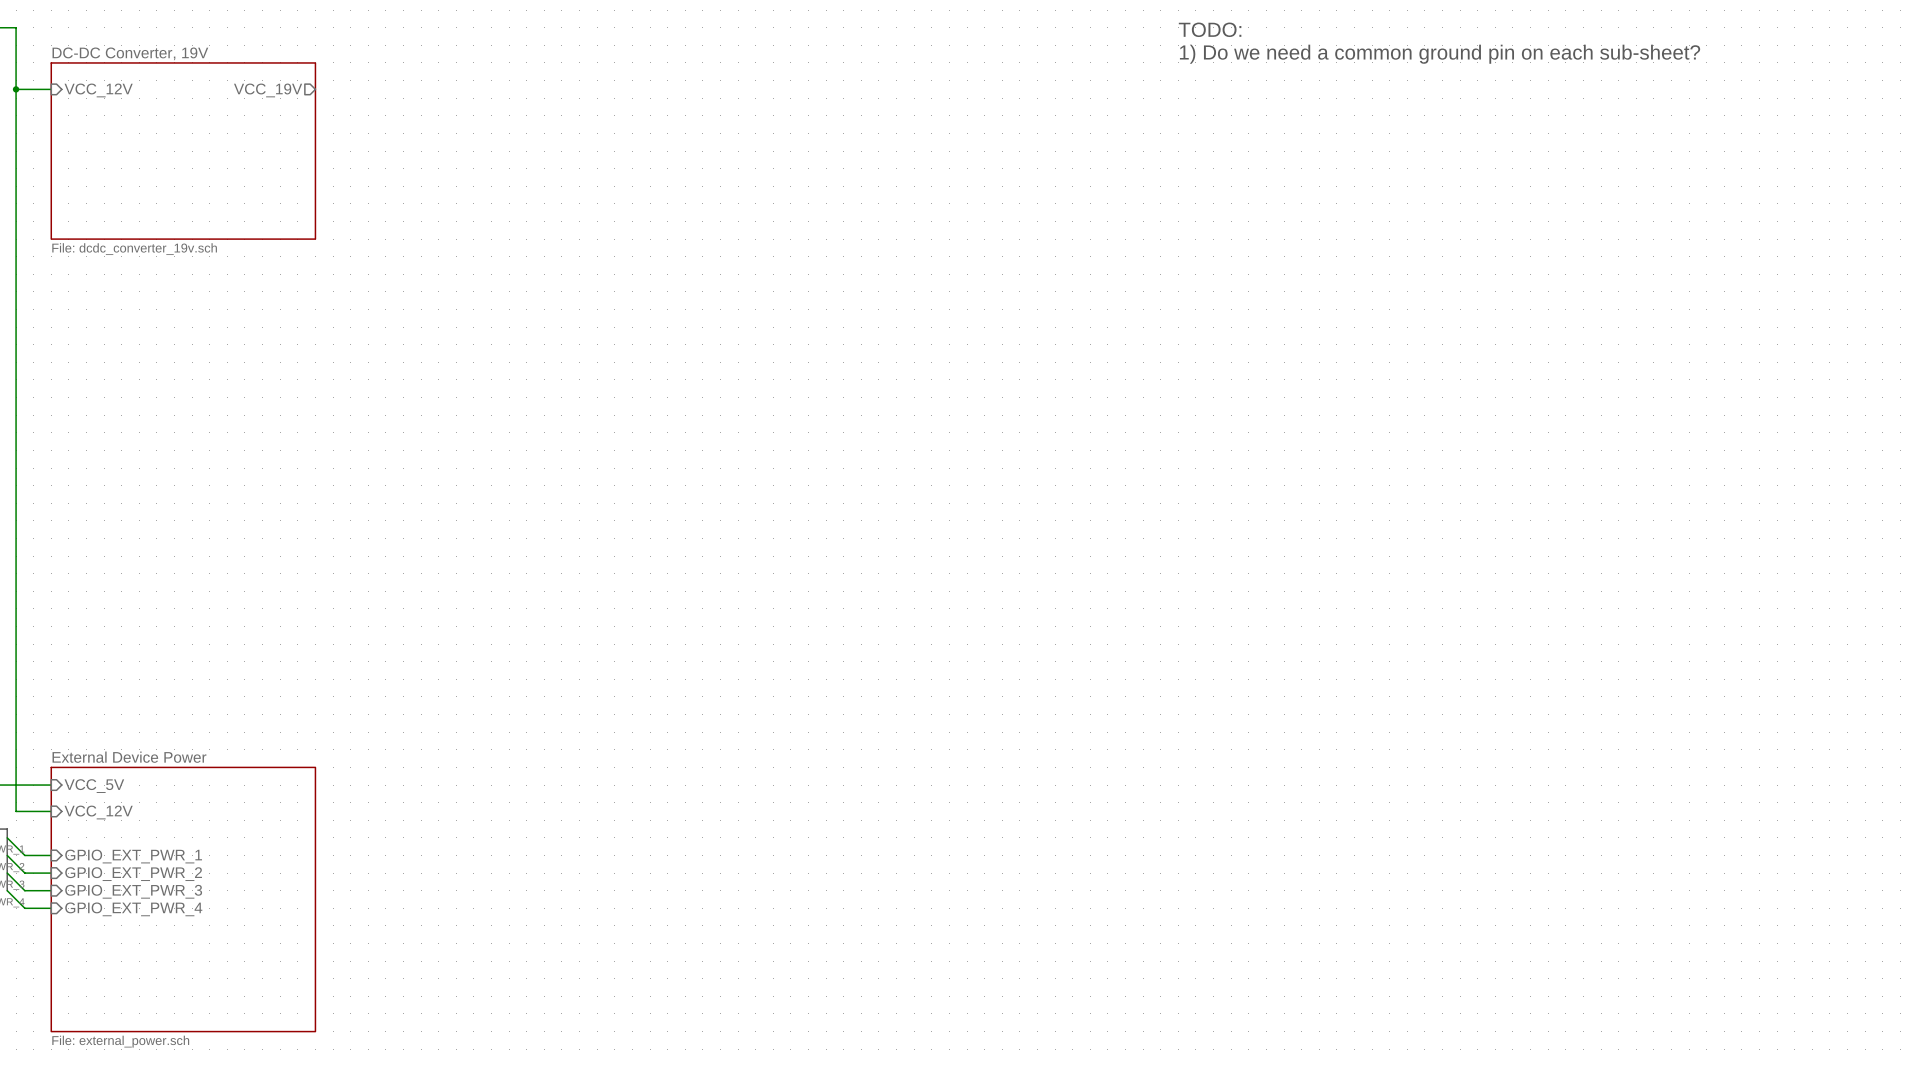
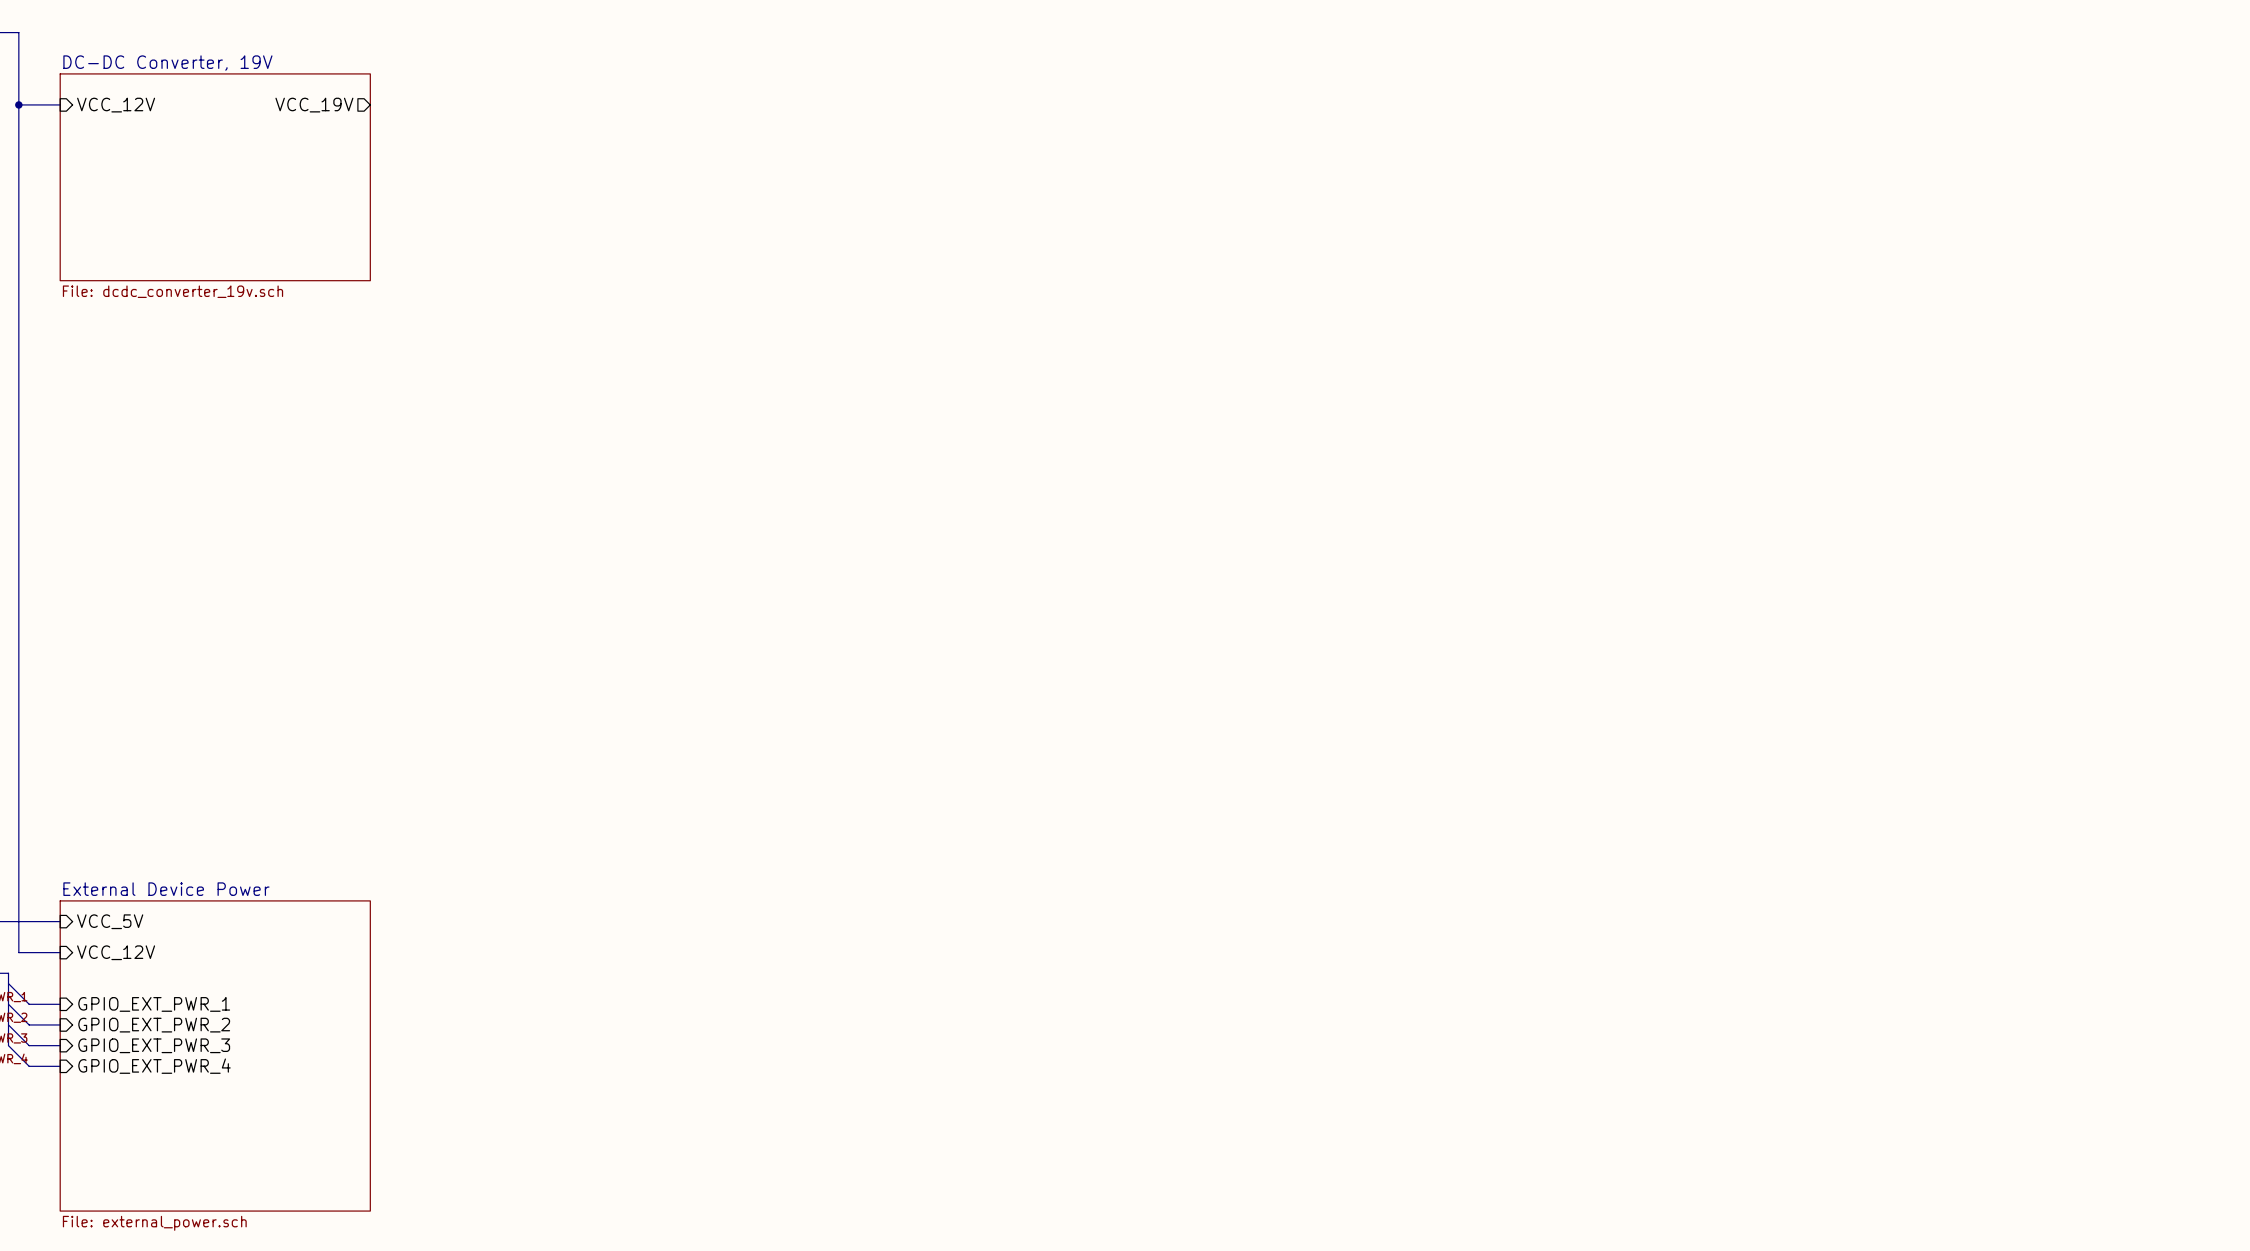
text: TODO: (1210, 29) -> none
text: 1) Do we need a common ground pin on each sub-sheet? (1440, 54) -> none

